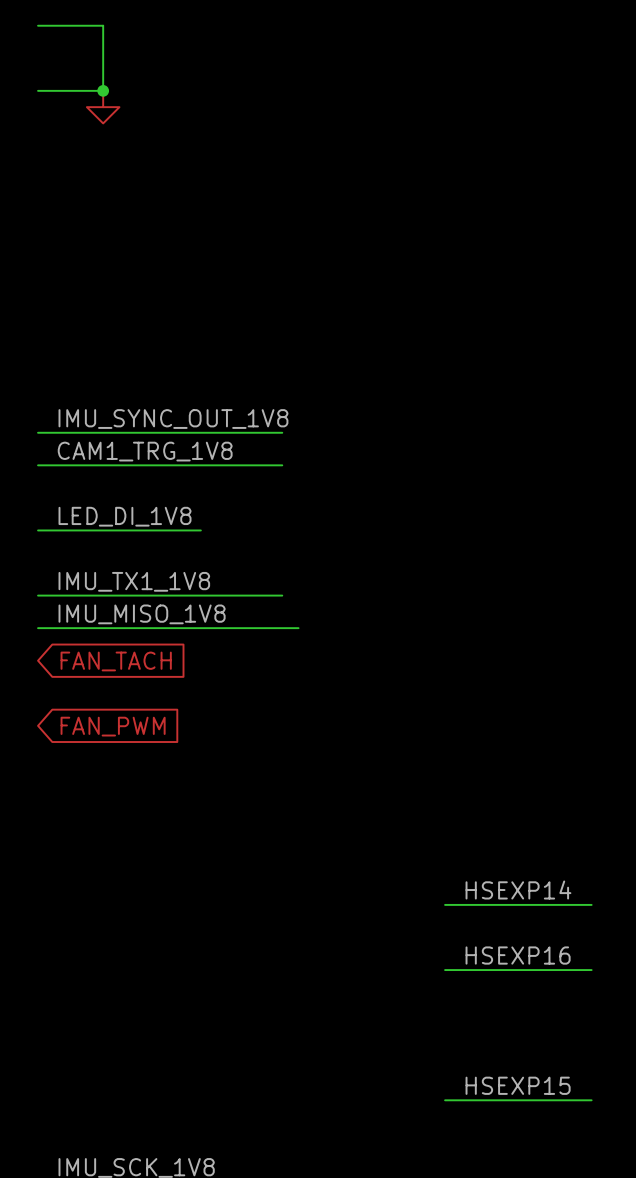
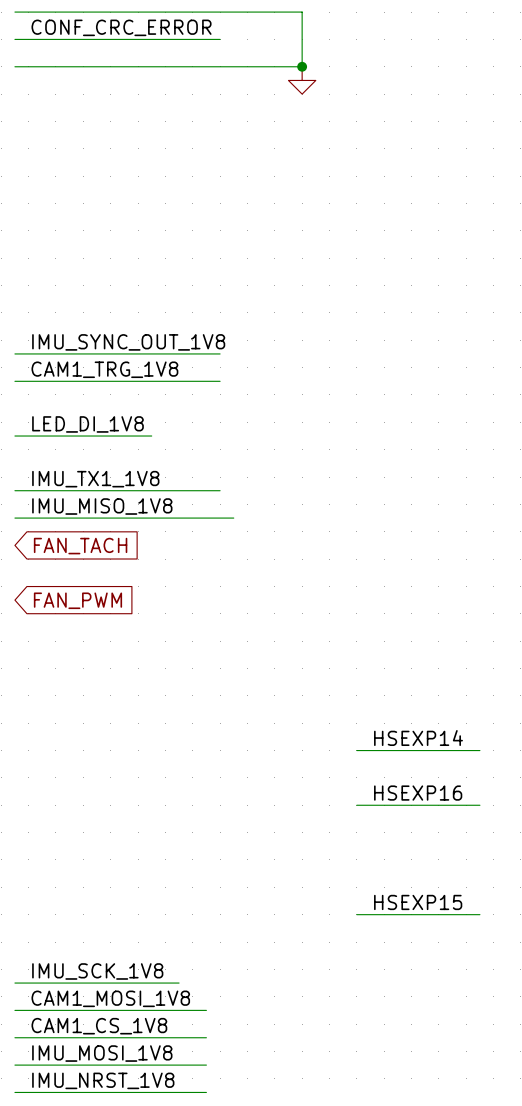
wire: (103, 25) (103, 90) -> (69, 12) (302, 12) (302, 66) (69, 66)
label: none -> CONF_CRC_ERROR (121, 27)
wire: none -> (14, 39) (220, 39)
junction: (103, 90) -> none
junction: none -> (302, 66)
power symbol position: (103, 107) -> (302, 80)

